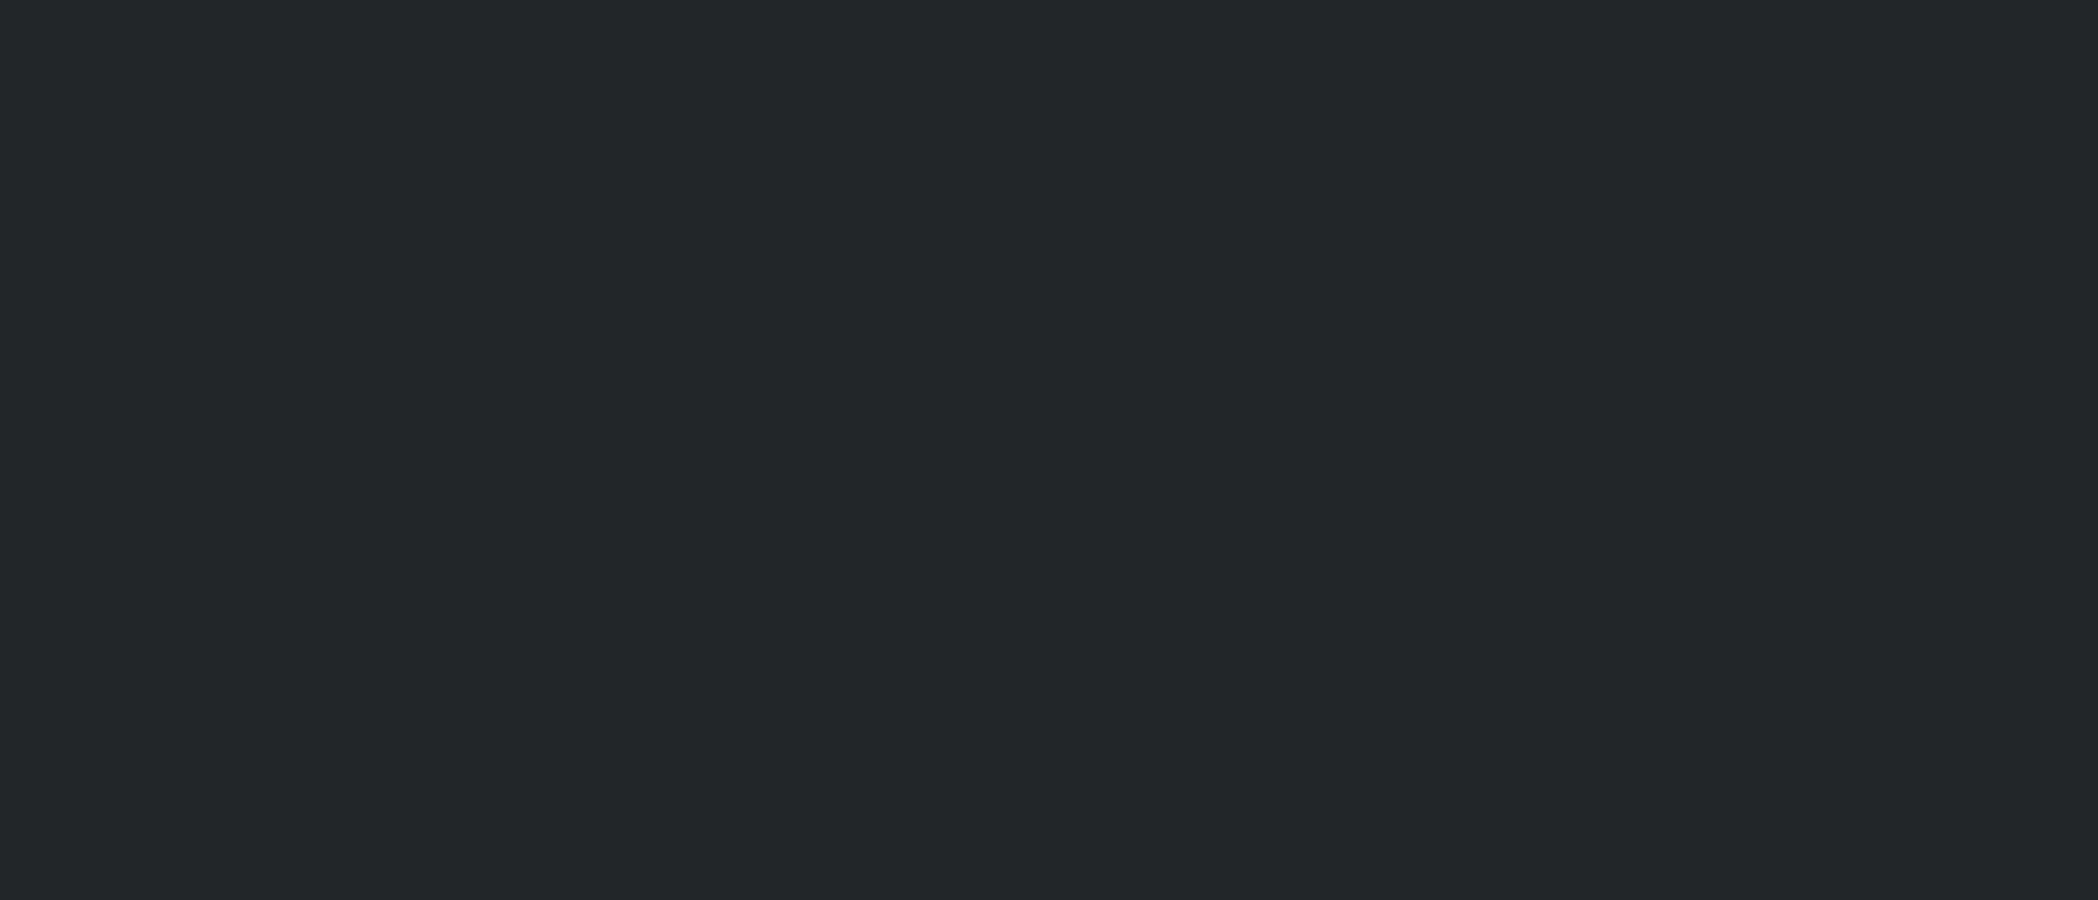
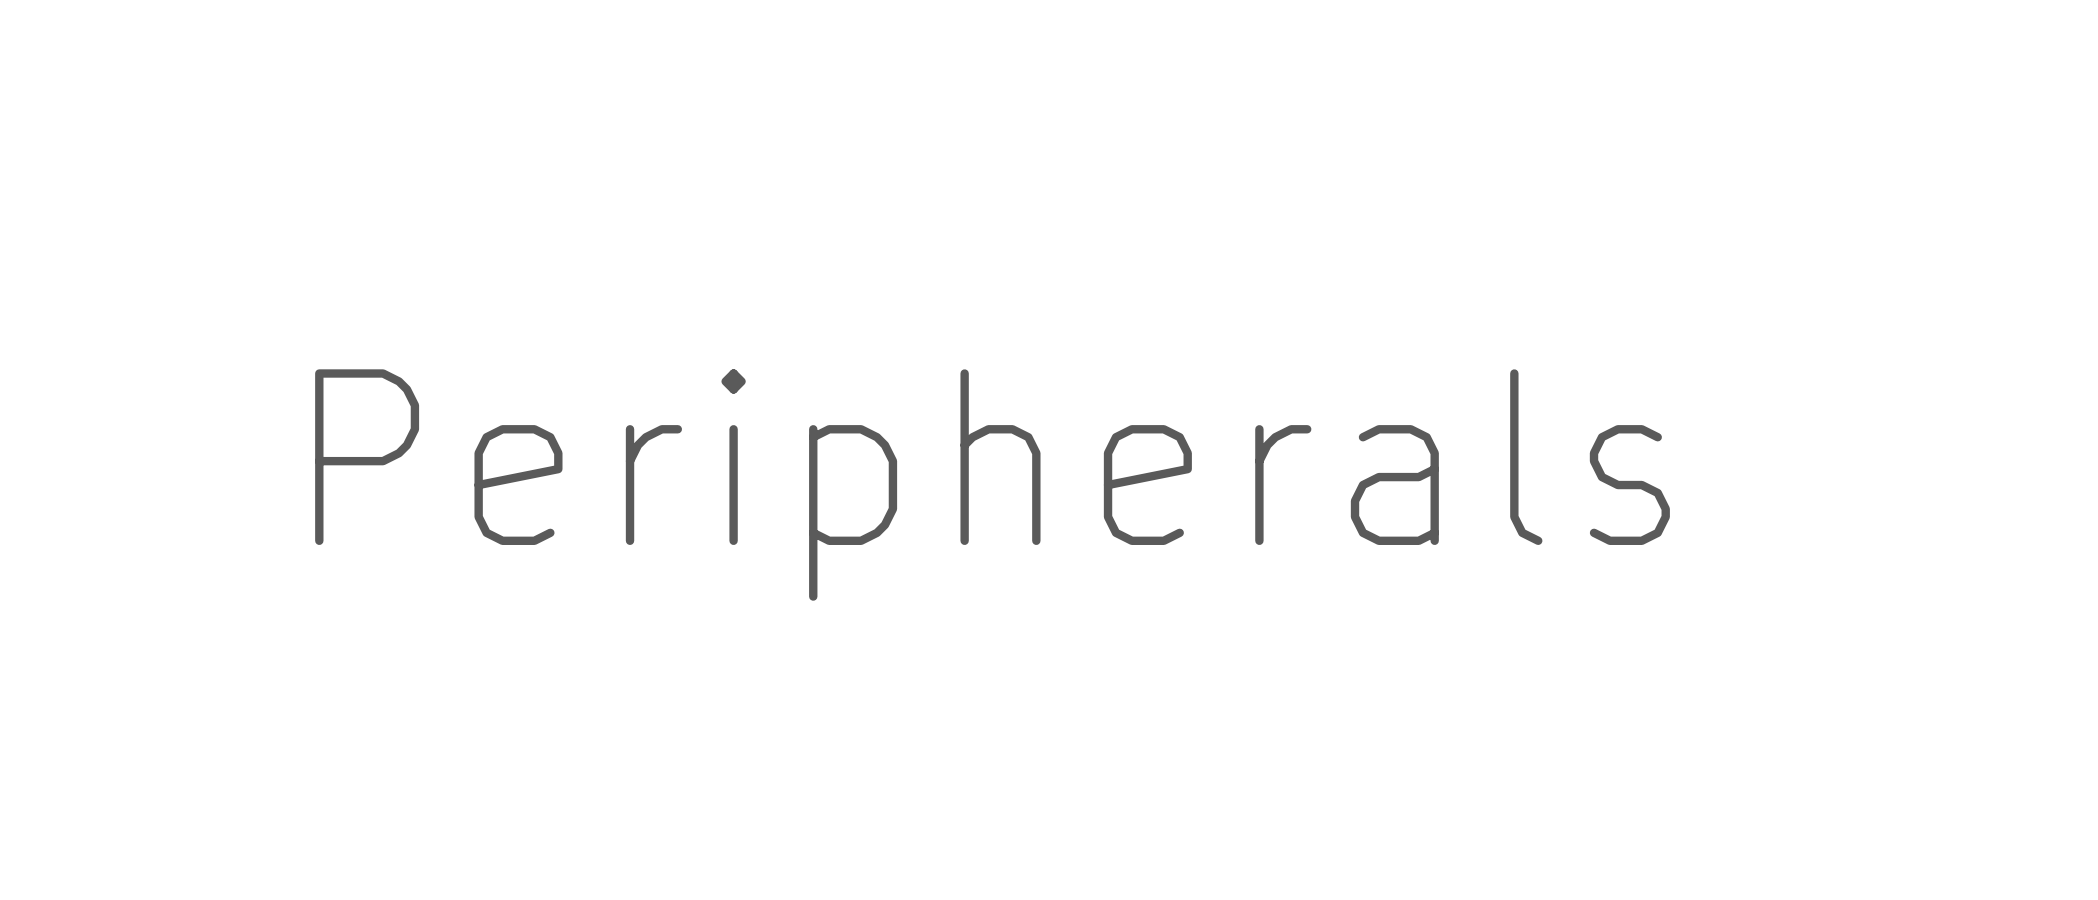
text: none -> Peripherals (992, 485)

